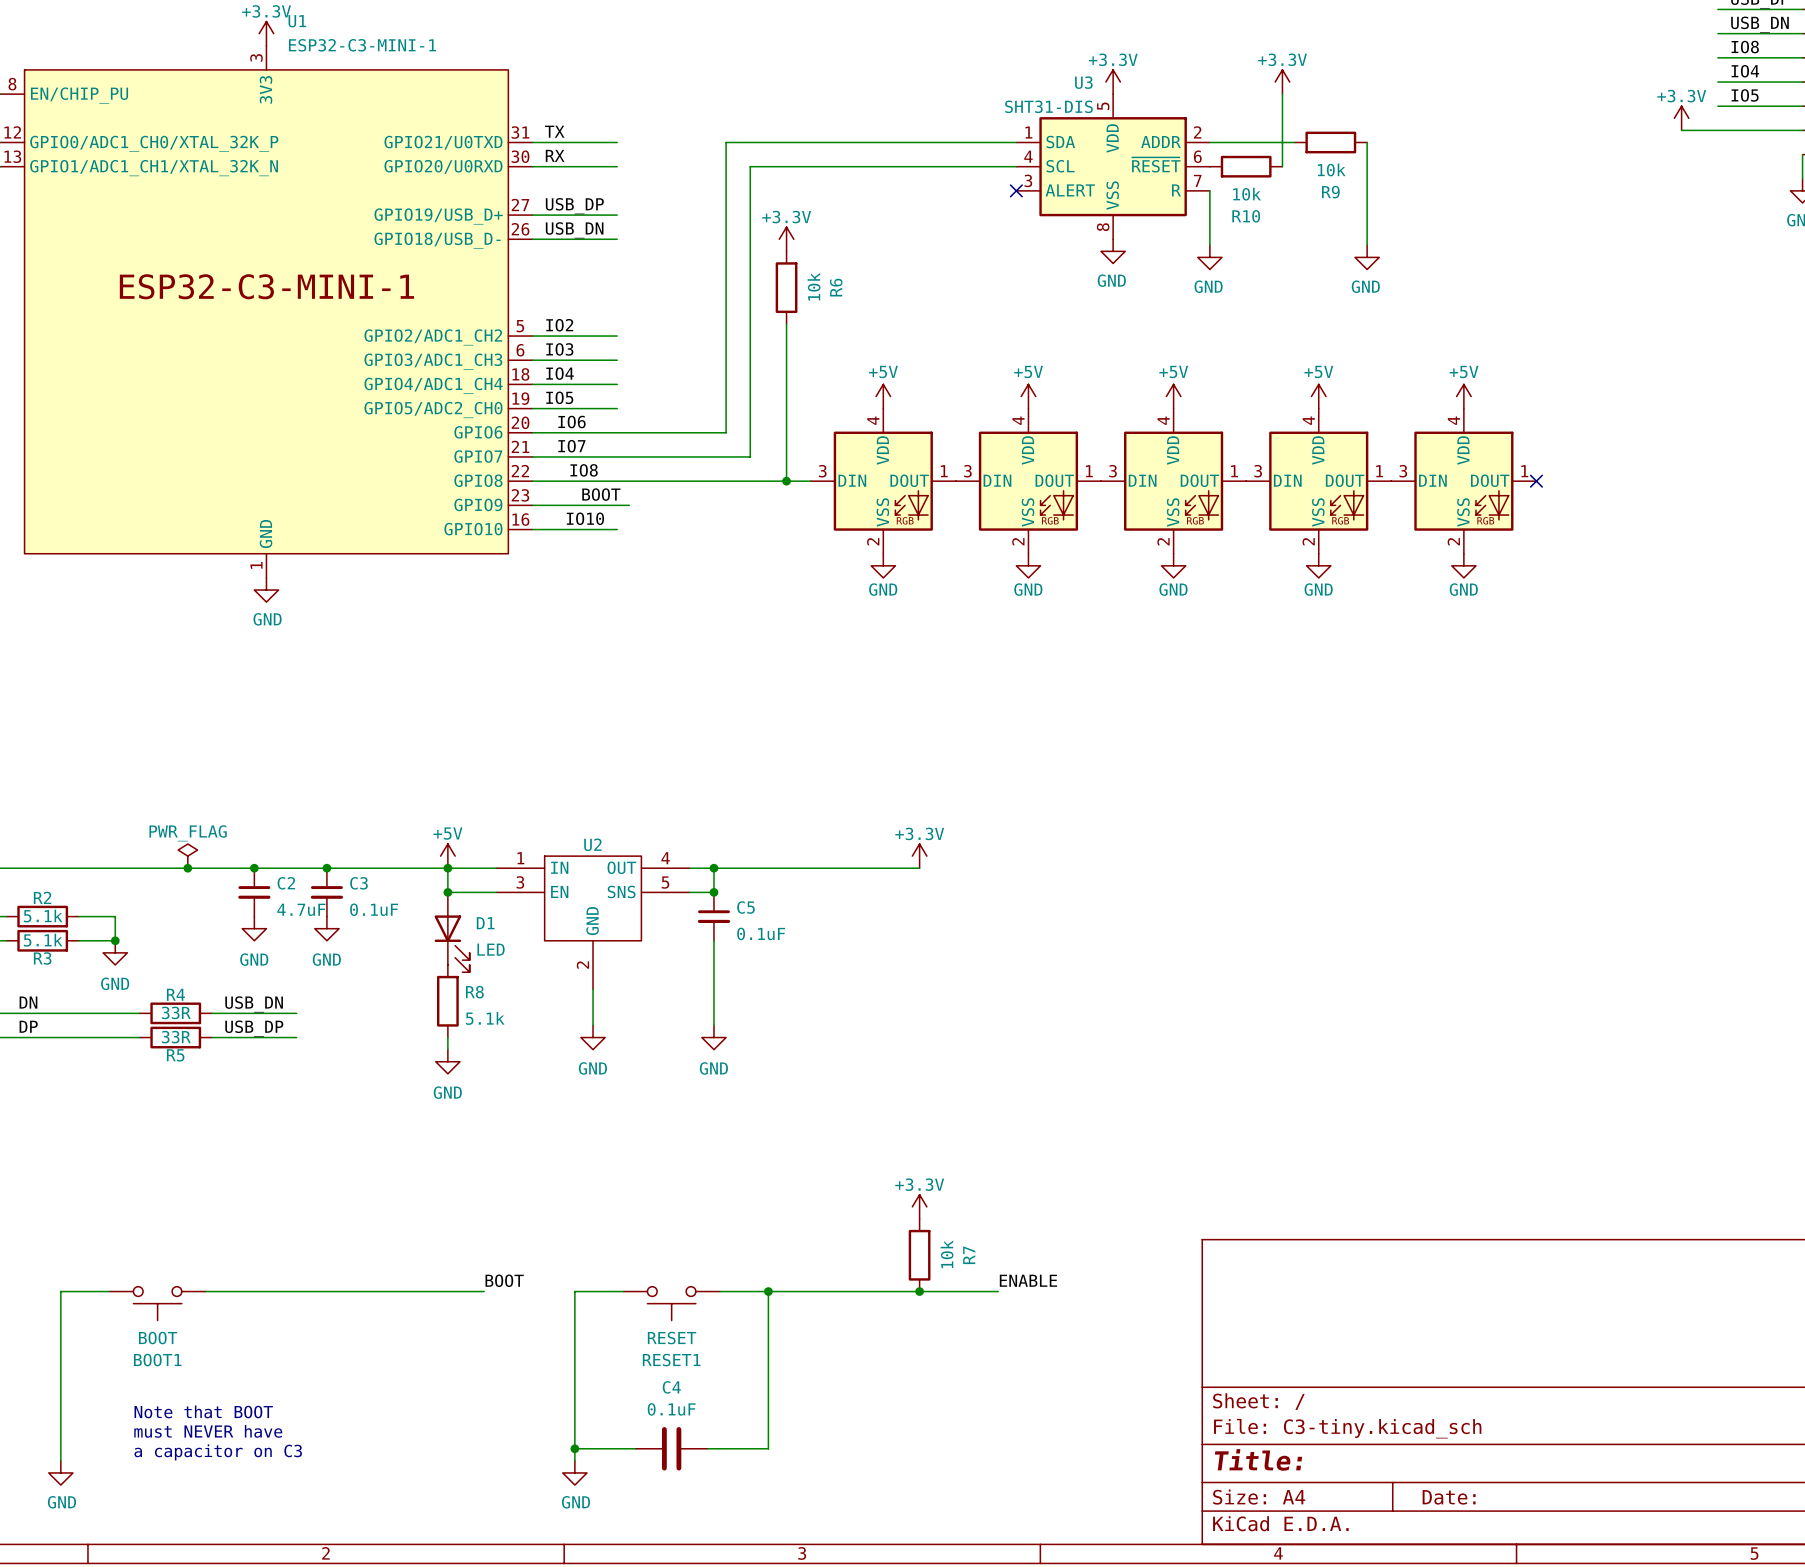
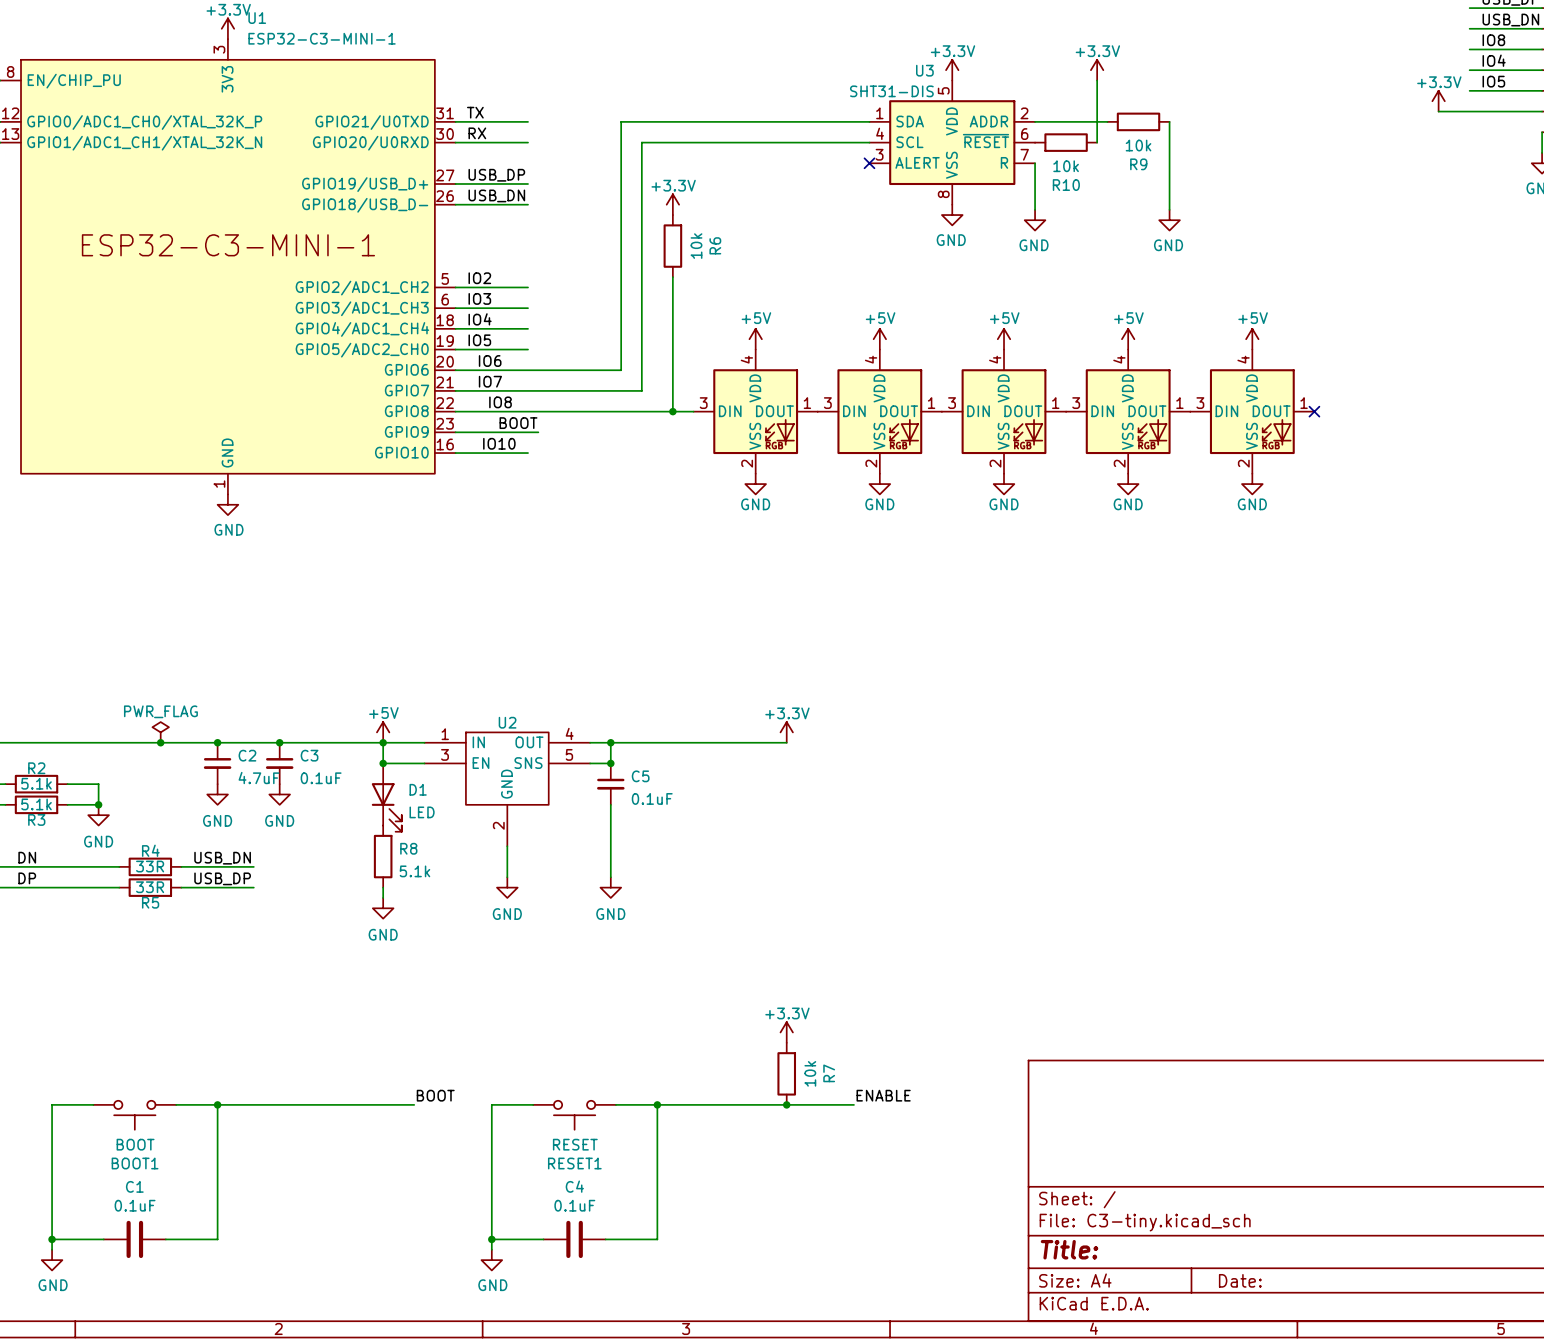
wire: none -> (217, 1104) (217, 1239) (165, 1239)
junction: none -> (217, 1104)
text: Note that BOOT (203, 1411) -> none
text: must NEVER have (208, 1431) -> none
wire: none -> (52, 1239) (103, 1239)
junction: none -> (52, 1239)
C1: none -> 0.1uF (134, 1239)
text: a capacitor on C3 (218, 1452) -> none

